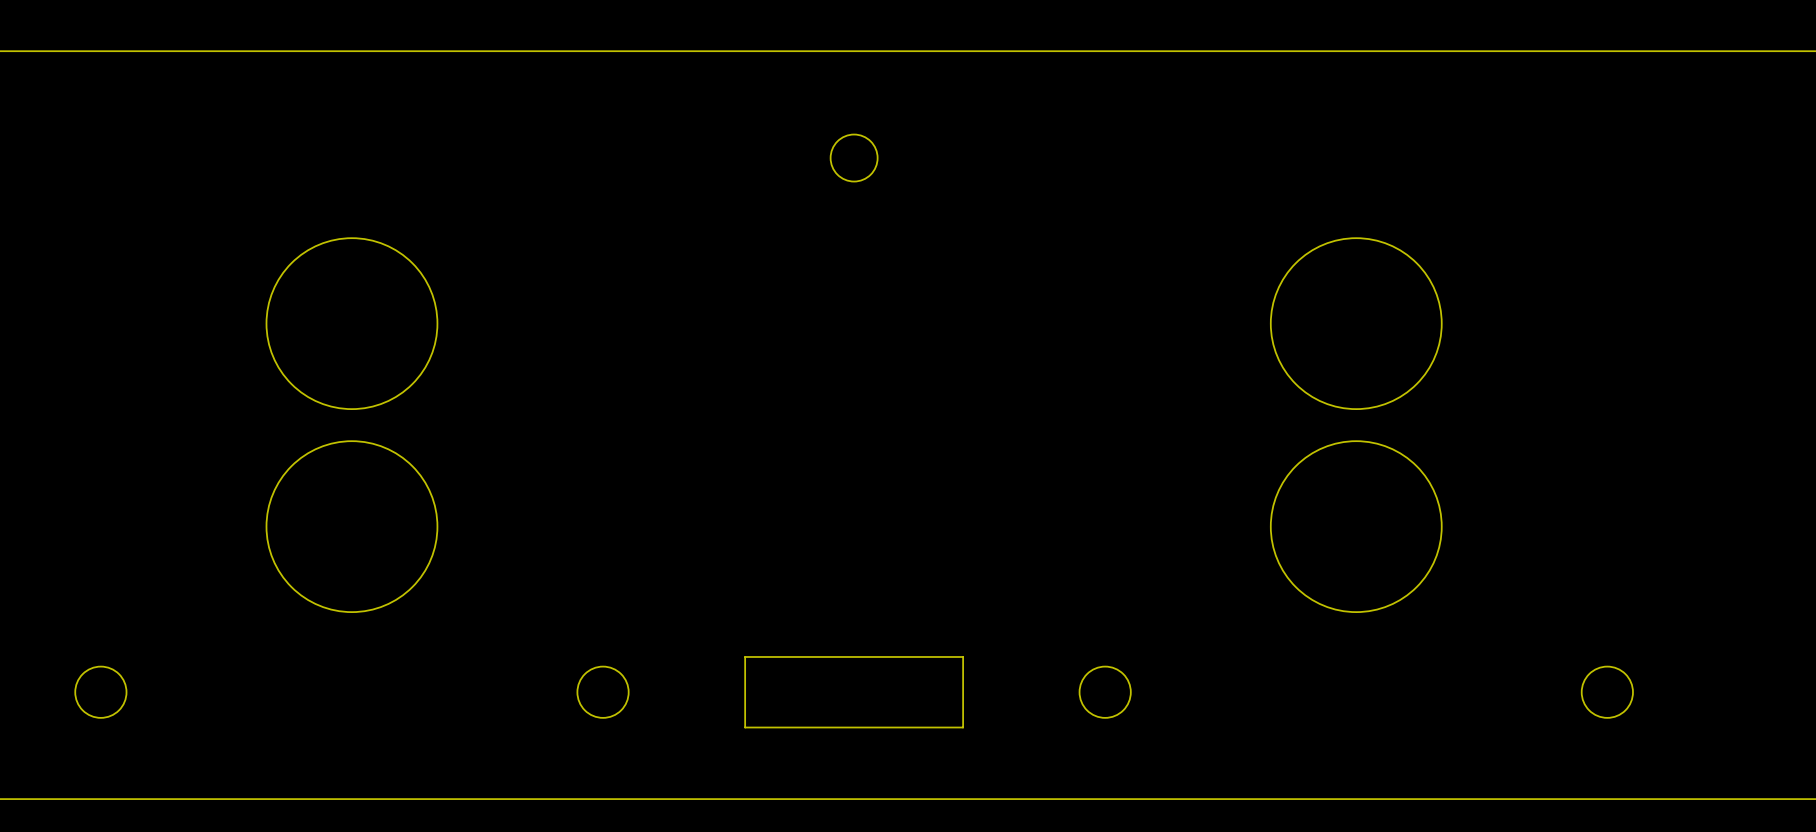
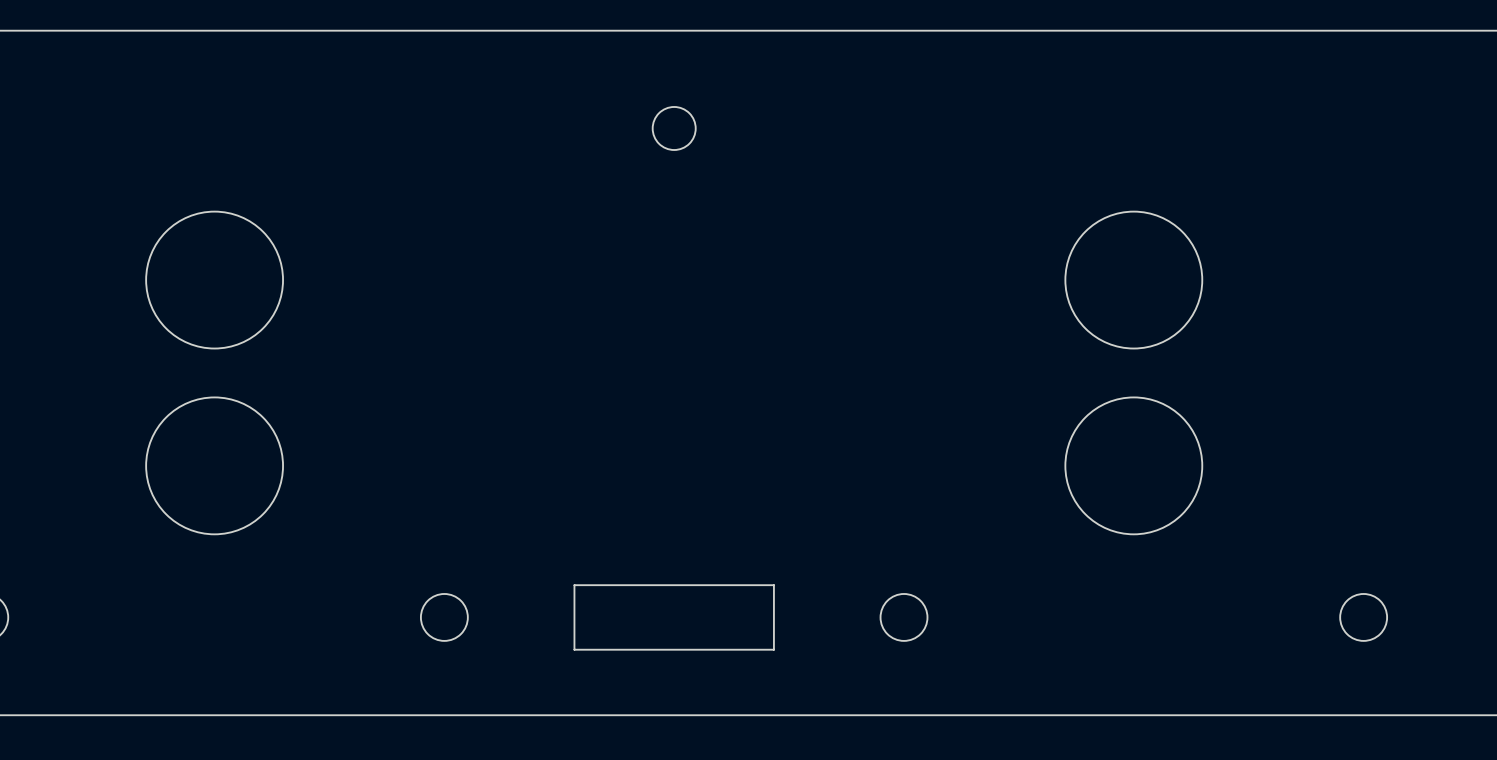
round board edge size: [265, 237, 438, 410] -> [145, 211, 284, 350]
round board edge size: [1270, 237, 1443, 410] -> [1064, 211, 1203, 350]
round board edge size: [265, 440, 438, 613] -> [145, 396, 284, 535]
round board edge size: [1270, 440, 1443, 613] -> [1064, 396, 1203, 535]

